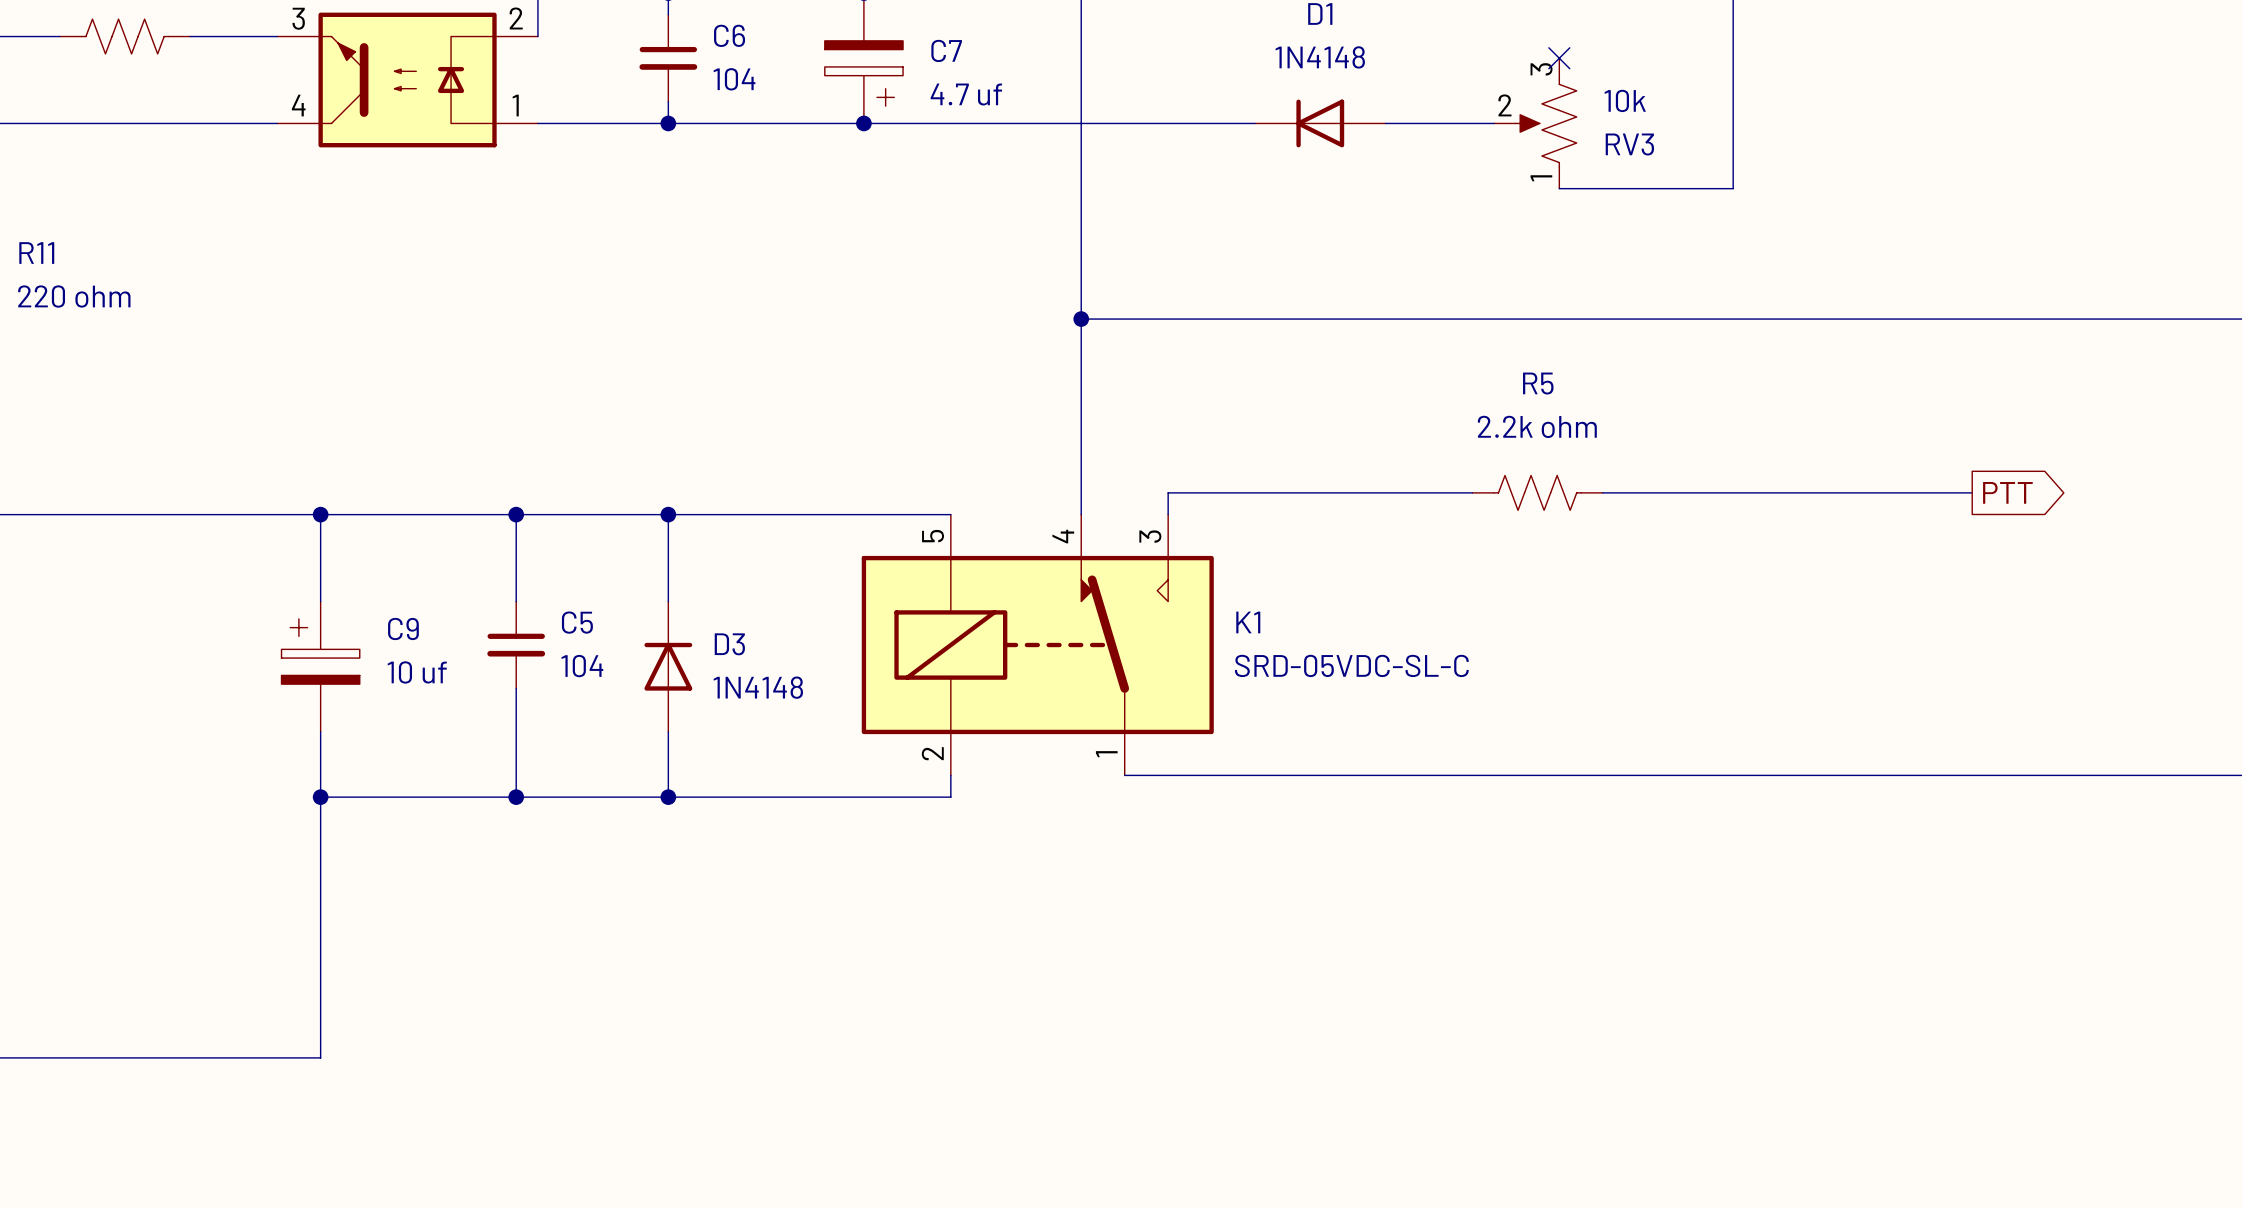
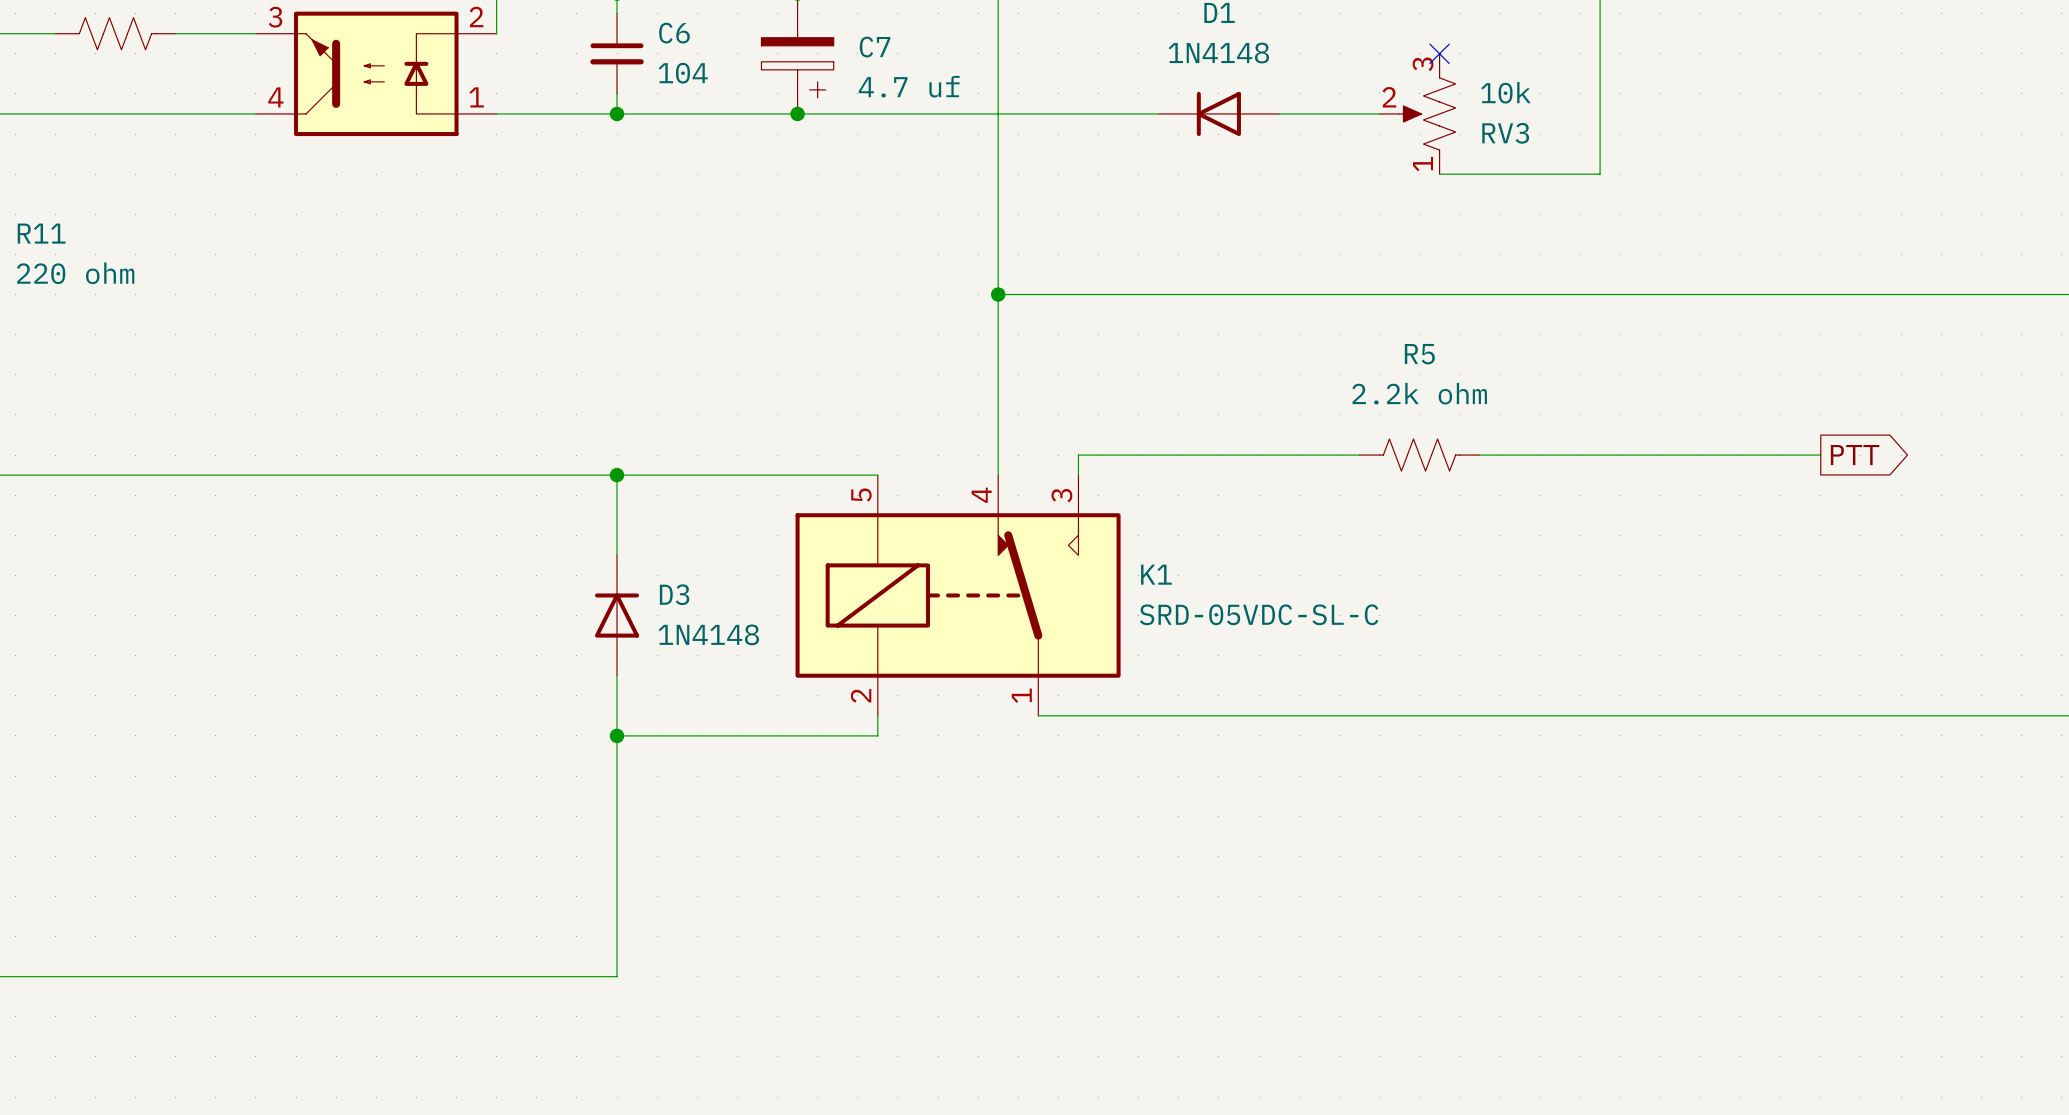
wire: (320, 514) (320, 601) -> none
junction: (320, 514) -> none
wire: (516, 514) (516, 601) -> none
junction: (516, 514) -> none
C5: 104 (516, 645) -> none
C9: 10 uf (320, 666) -> none
wire: (516, 688) (516, 797) -> none
wire: (320, 731) (320, 1057) -> none
wire: (320, 797) (668, 797) -> (296, 976) (617, 976) (617, 735)
junction: (320, 797) -> none
junction: (516, 797) -> none

